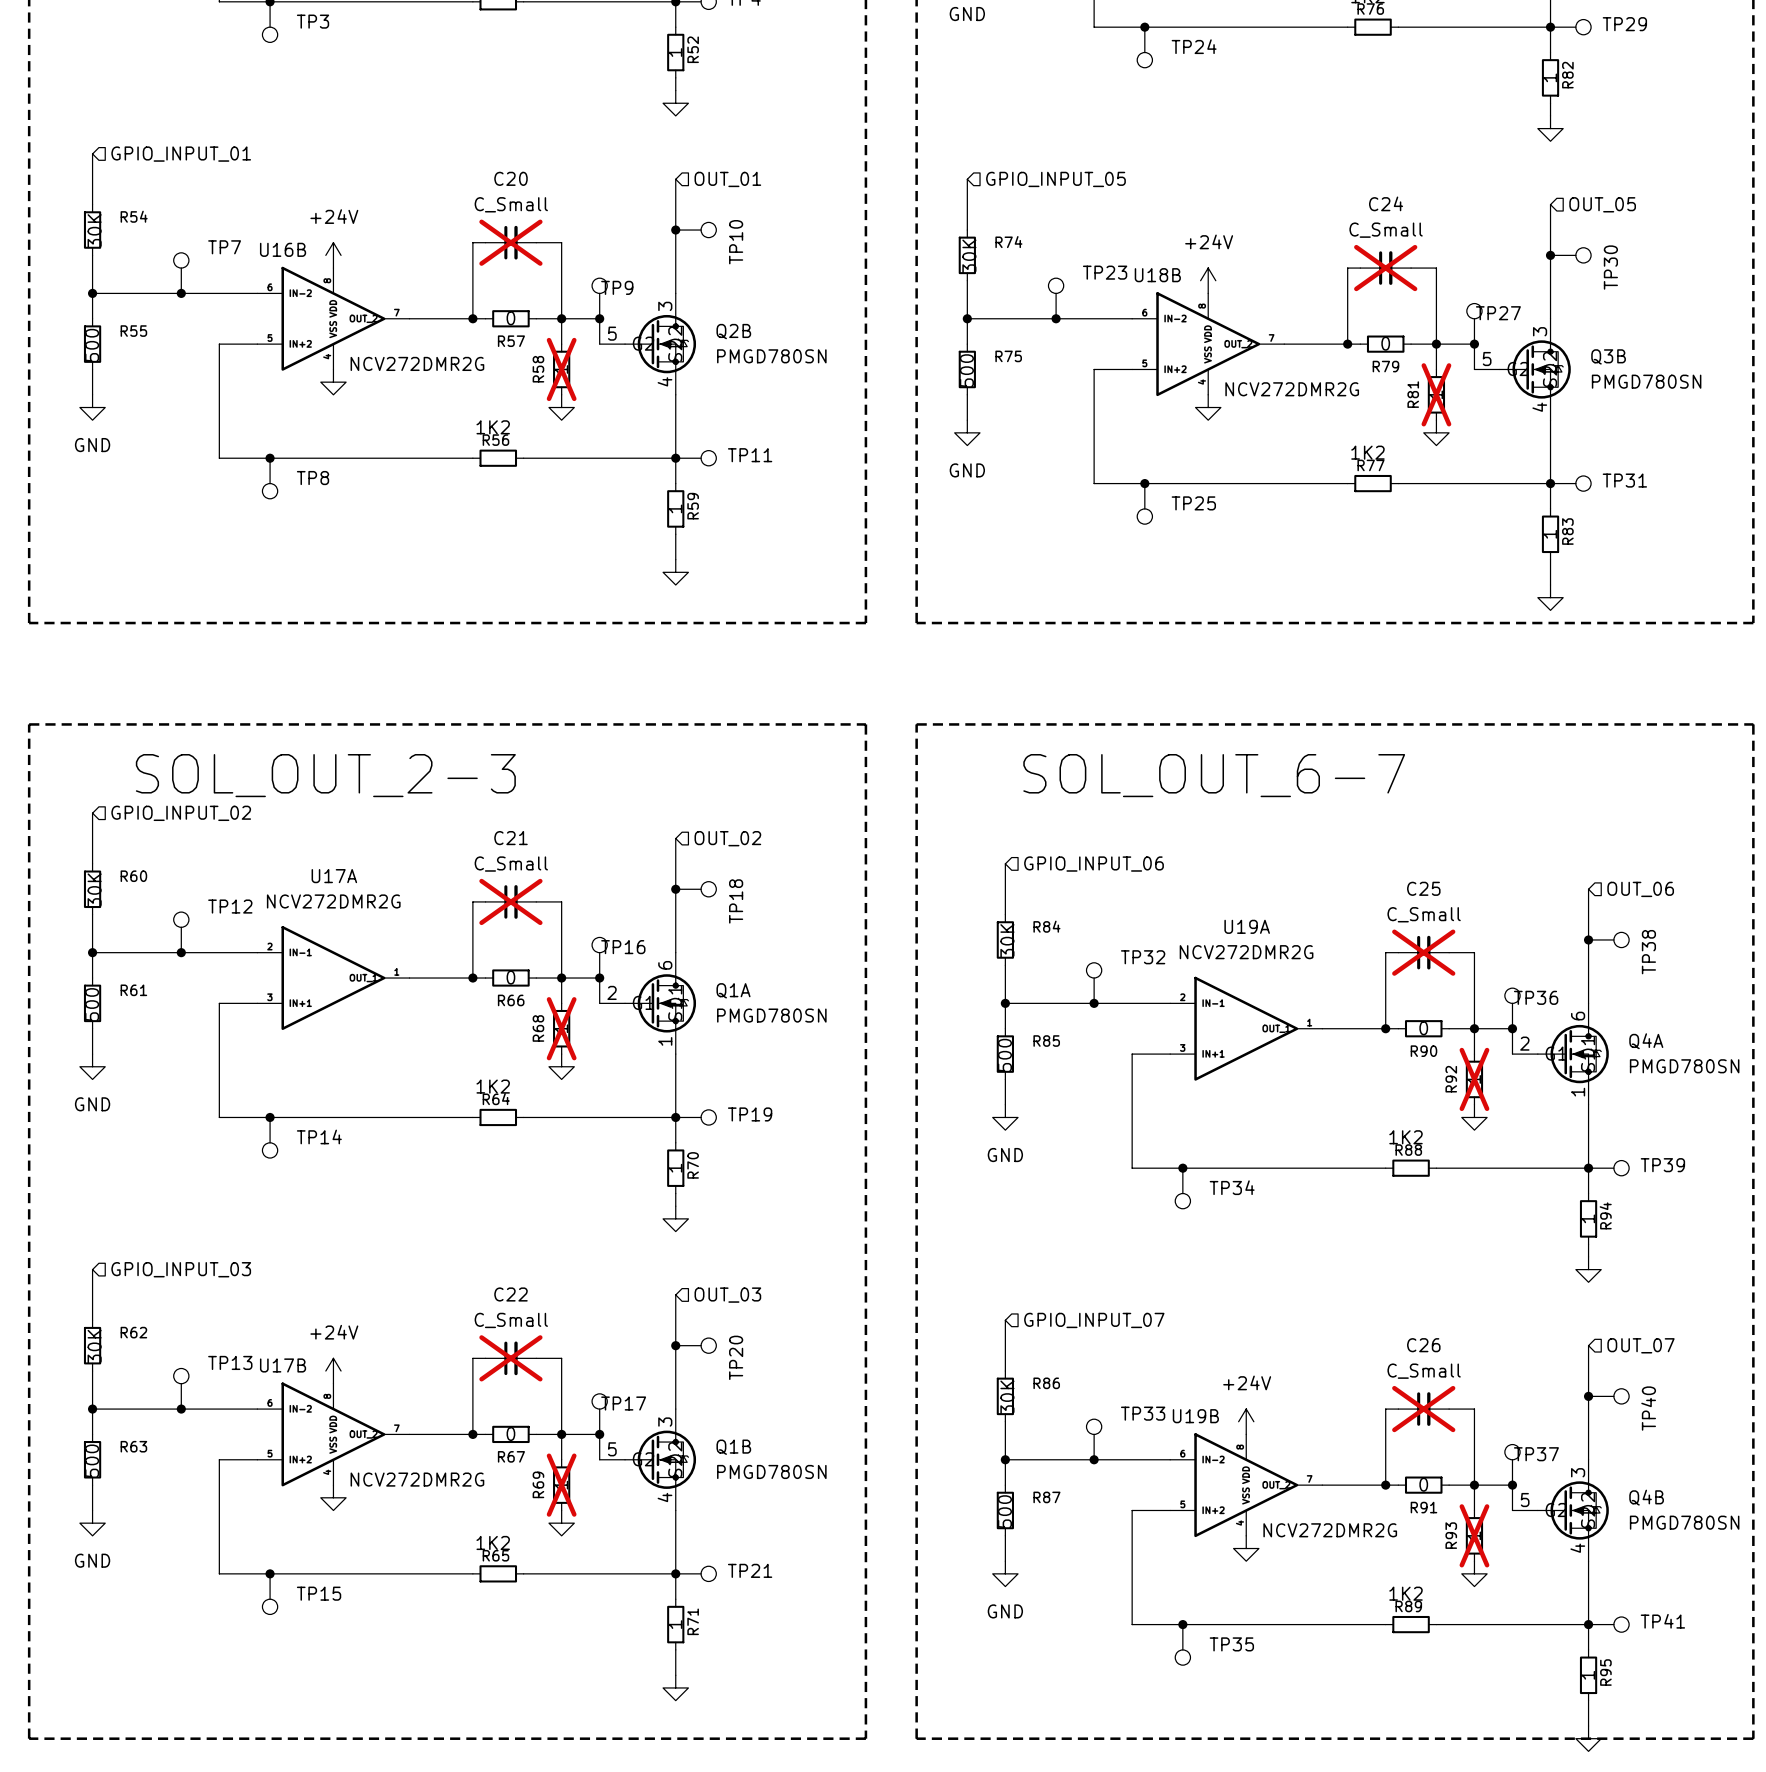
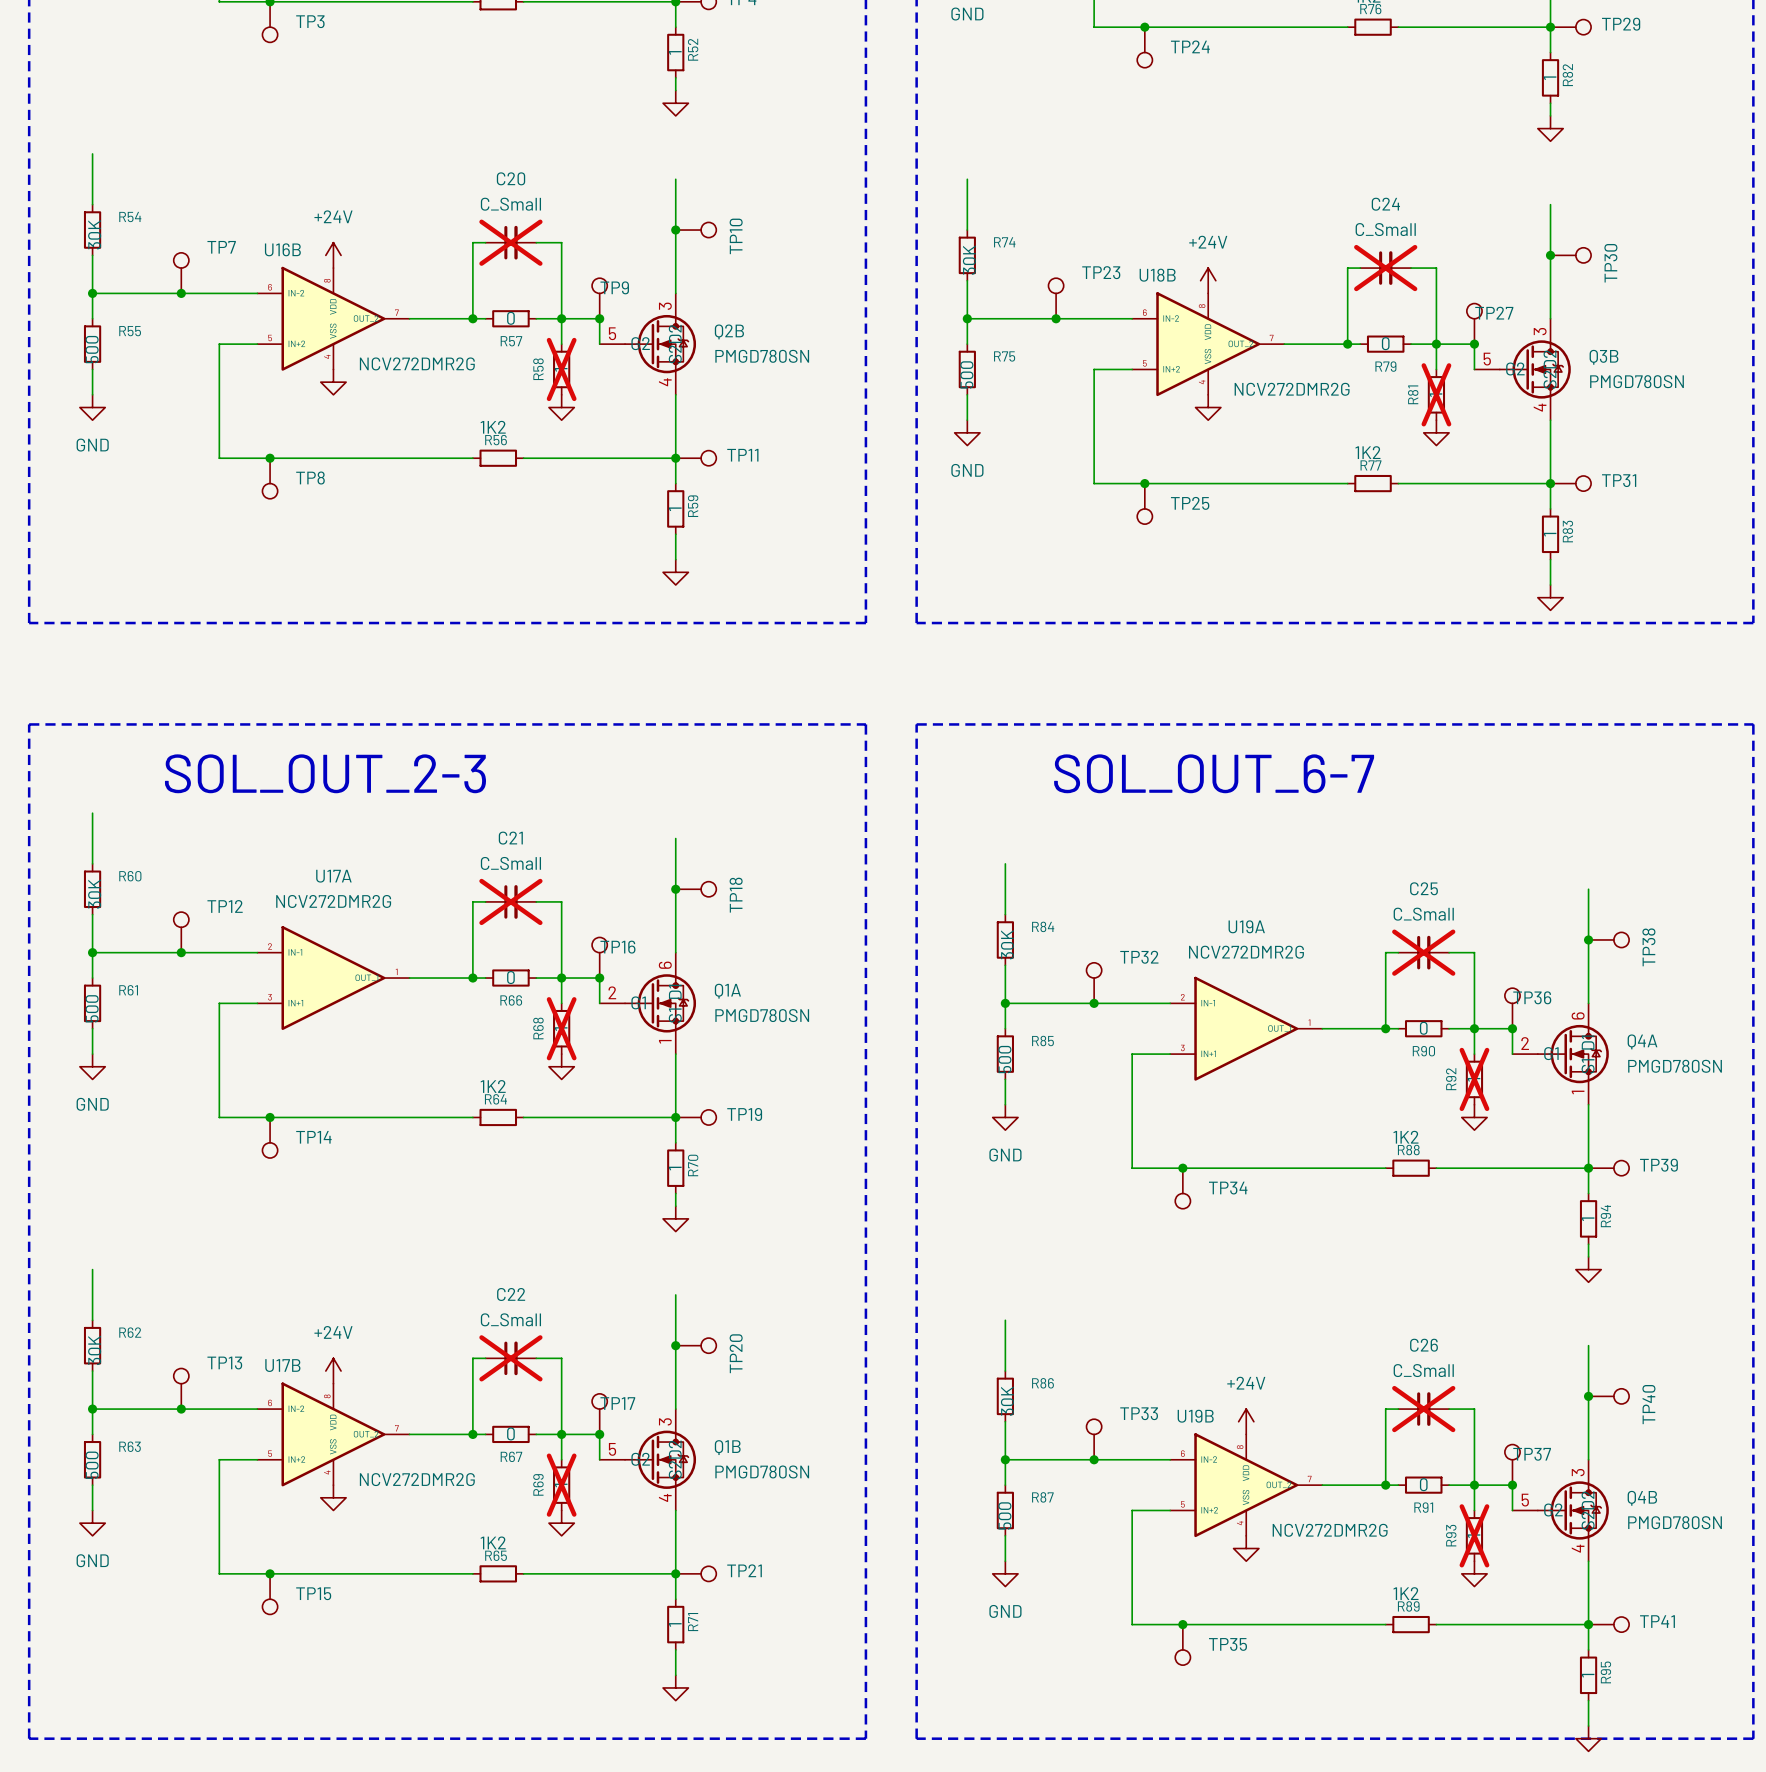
hierarchical label: GPIO_INPUT_01 (181, 154) -> none
hierarchical label: OUT_01 (727, 179) -> none
hierarchical label: GPIO_INPUT_05 (1055, 179) -> none
hierarchical label: OUT_05 (1602, 204) -> none
hierarchical label: GPIO_INPUT_02 (181, 813) -> none
hierarchical label: OUT_02 (727, 838) -> none
hierarchical label: GPIO_INPUT_06 (1094, 864) -> none
hierarchical label: OUT_06 (1640, 889) -> none
hierarchical label: GPIO_INPUT_03 (181, 1269) -> none
hierarchical label: OUT_03 (727, 1295) -> none
hierarchical label: GPIO_INPUT_07 (1094, 1320) -> none
hierarchical label: OUT_07 (1640, 1345) -> none

